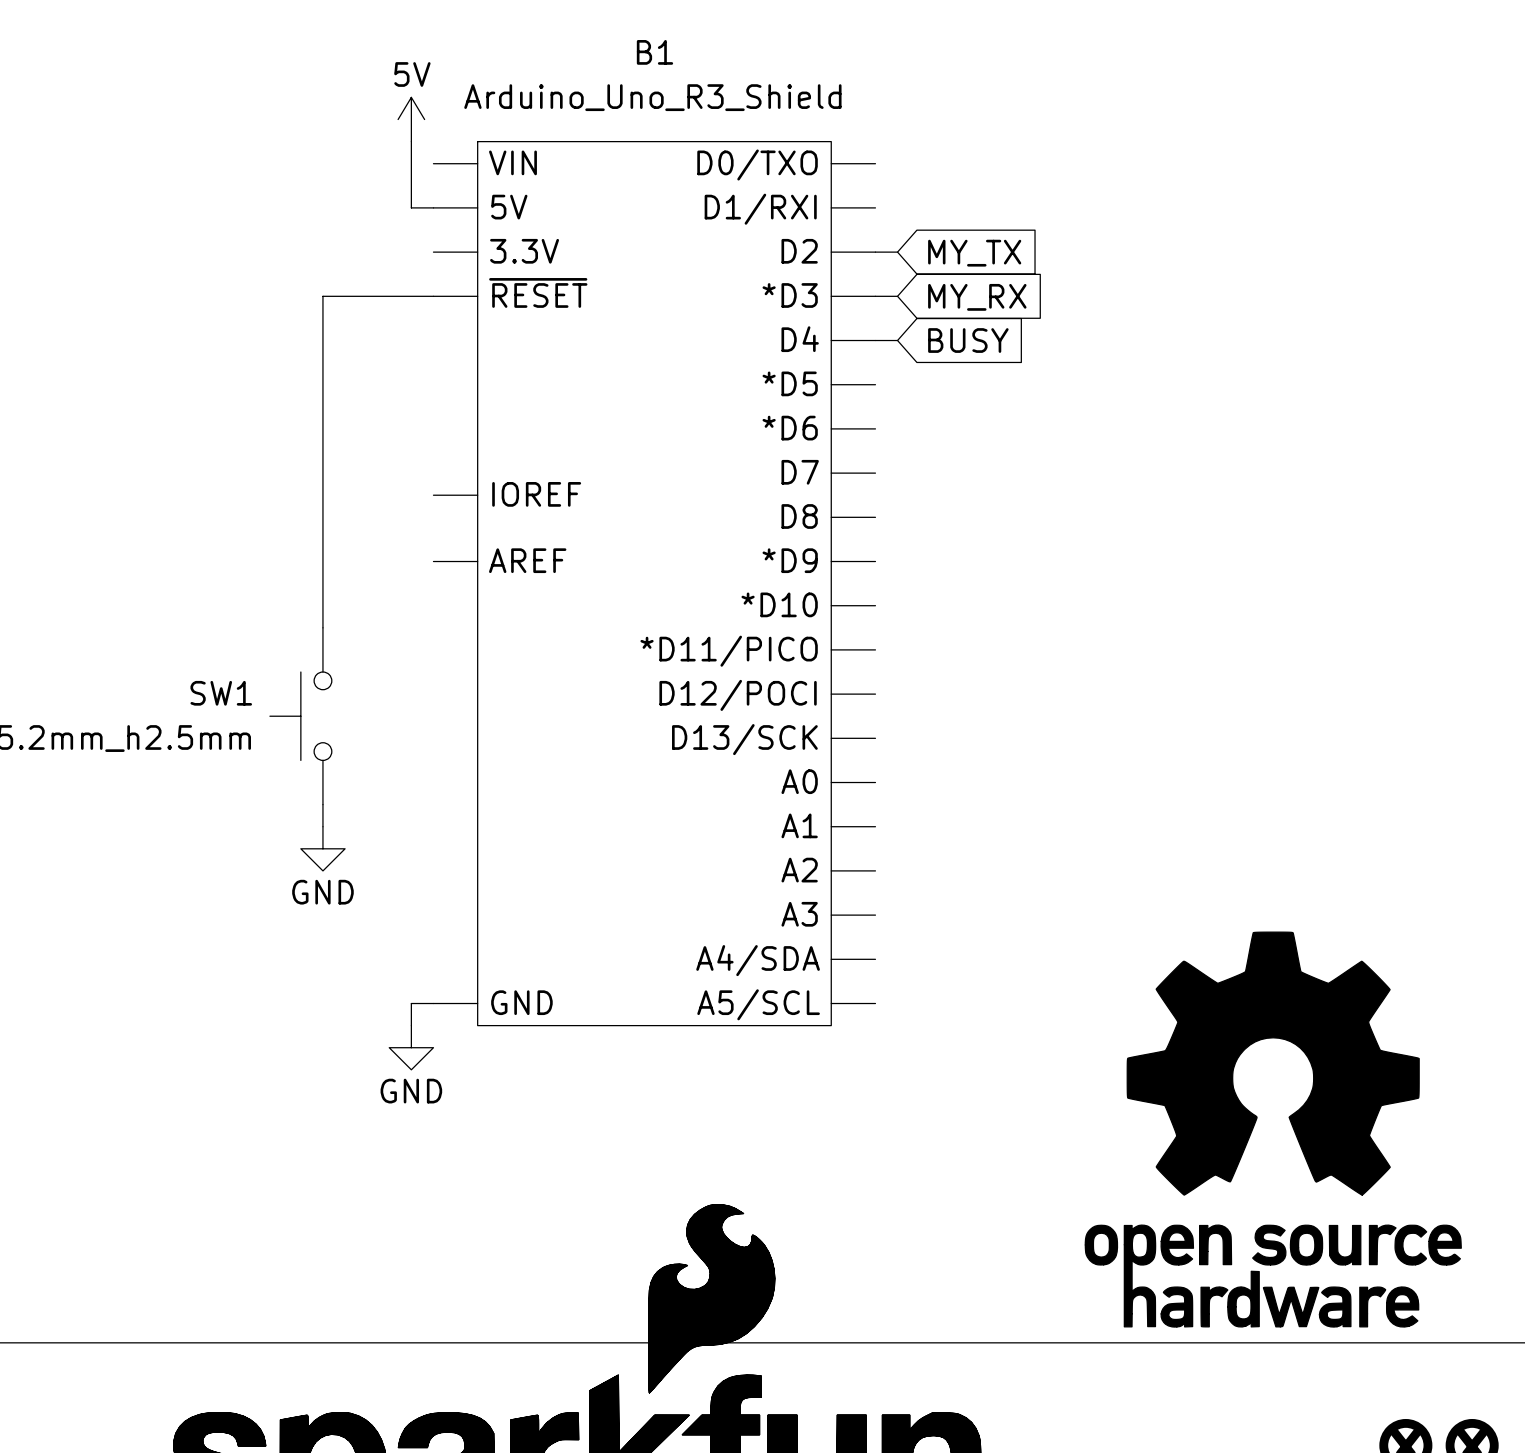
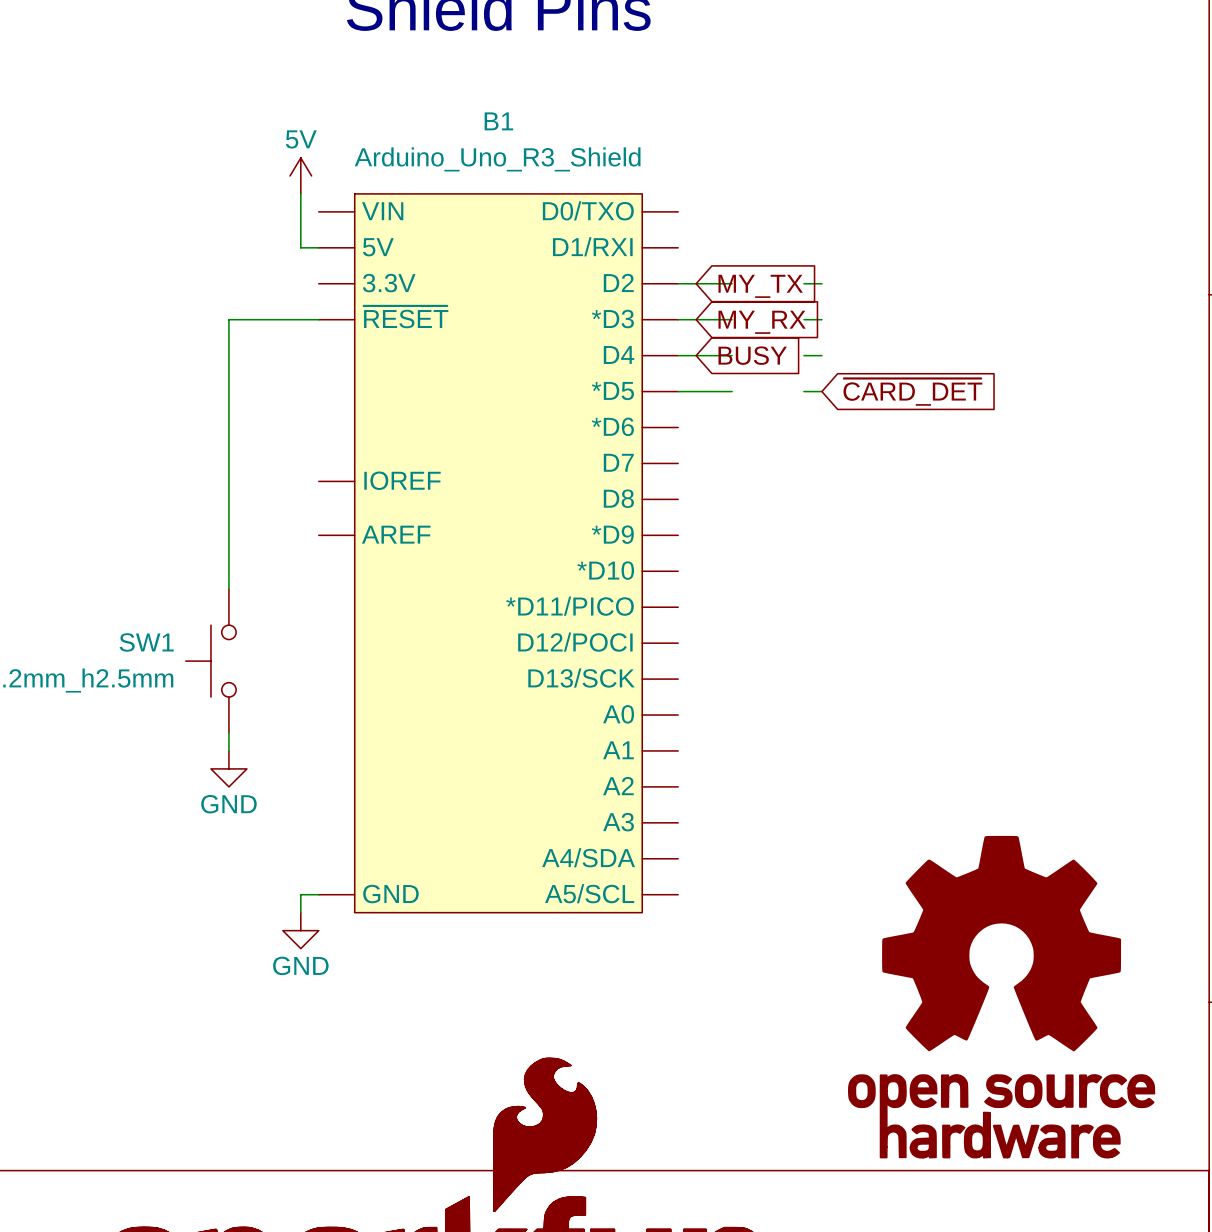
wire: none -> (696, 283) (732, 283)
wire: none -> (803, 283) (821, 283)
wire: none -> (696, 319) (732, 319)
wire: none -> (803, 319) (821, 319)
wire: none -> (696, 355) (732, 355)
wire: none -> (803, 355) (821, 355)
global label: none -> ~{CARD_DET} (912, 392)
wire: none -> (678, 391) (732, 391)
wire: none -> (803, 391) (821, 391)

